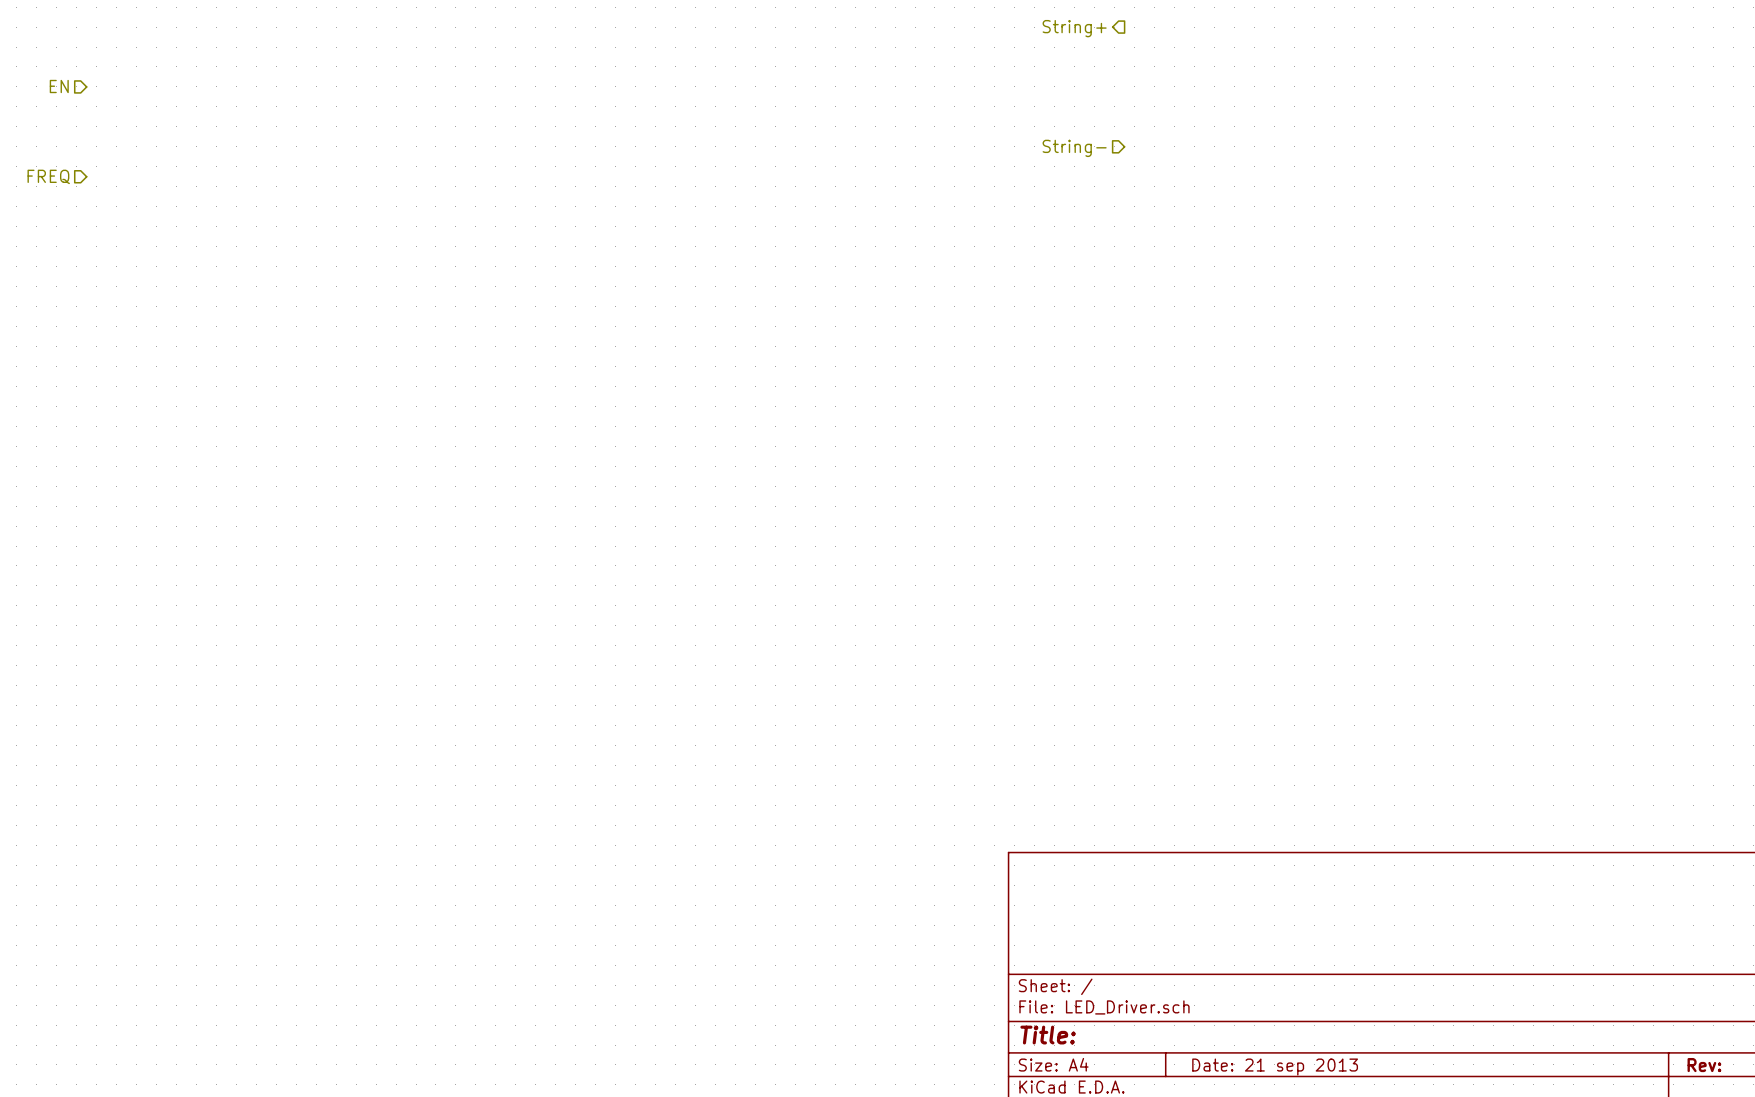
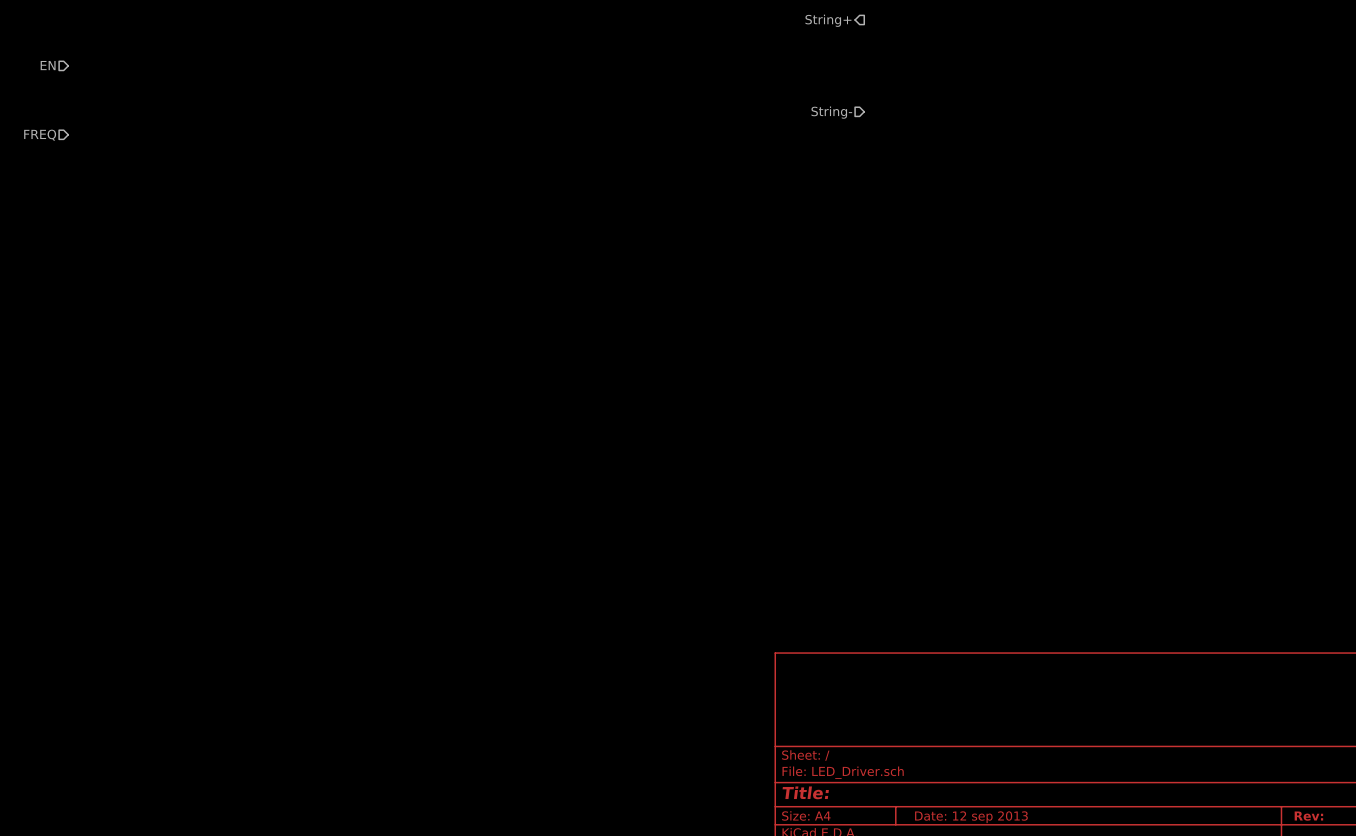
title block: Date: 21 sep 2013 (1275, 1067) -> Date: 12 sep 2013 (971, 817)

